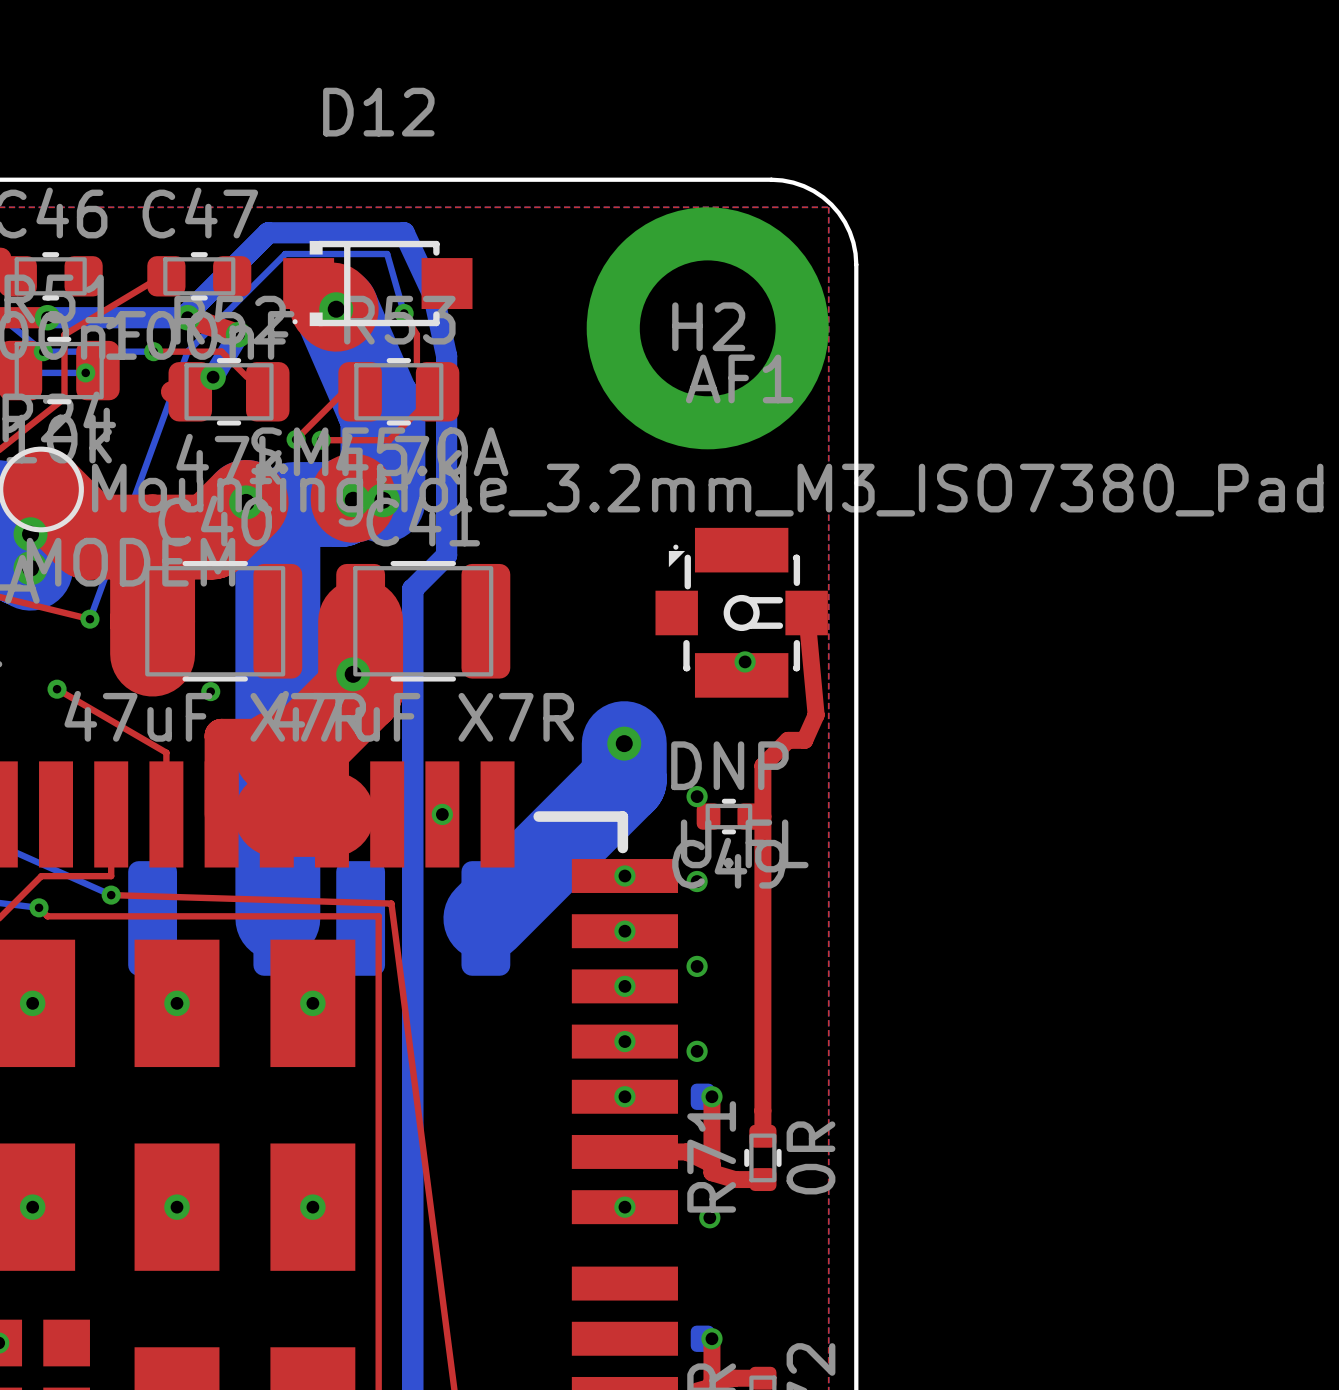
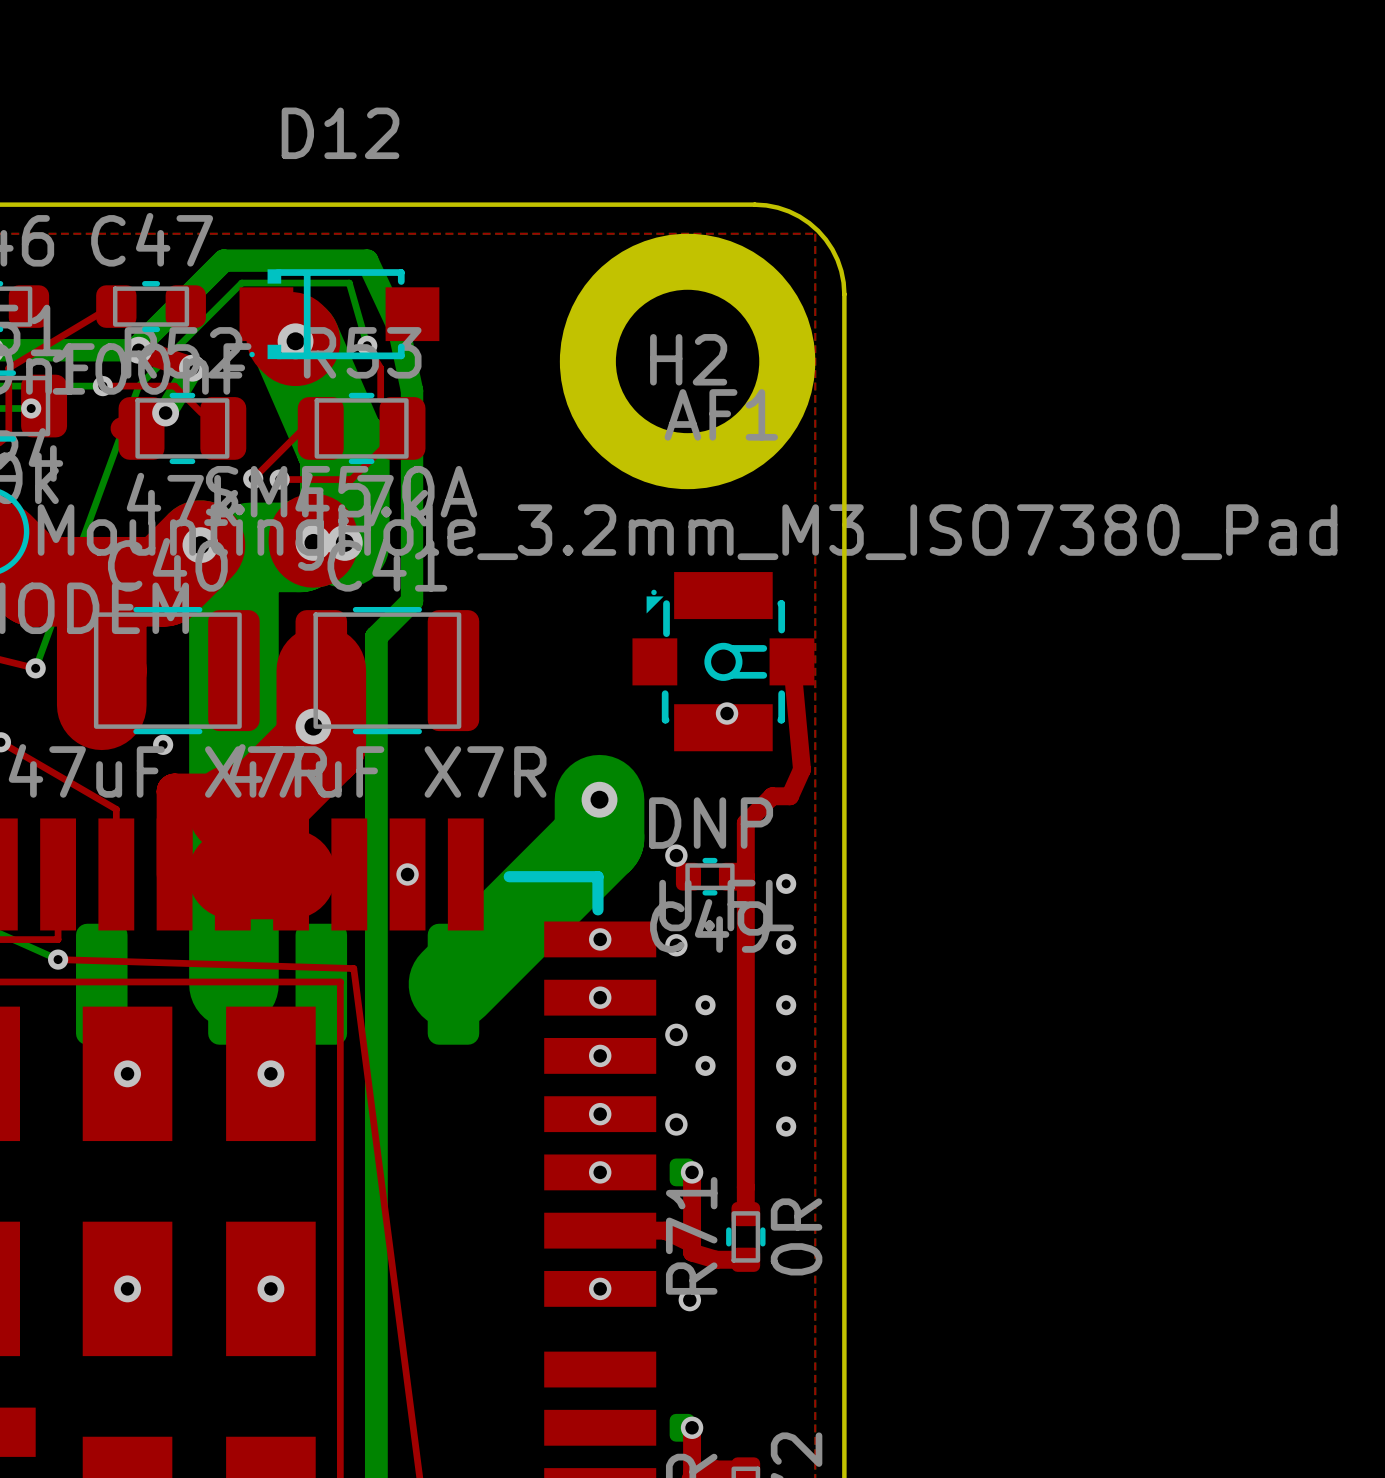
via: none -> (786, 883)
via: none -> (786, 944)
via: none -> (705, 1005)
via: none -> (786, 1005)
via: none -> (705, 1065)
via: none -> (786, 1065)
via: none -> (786, 1126)

